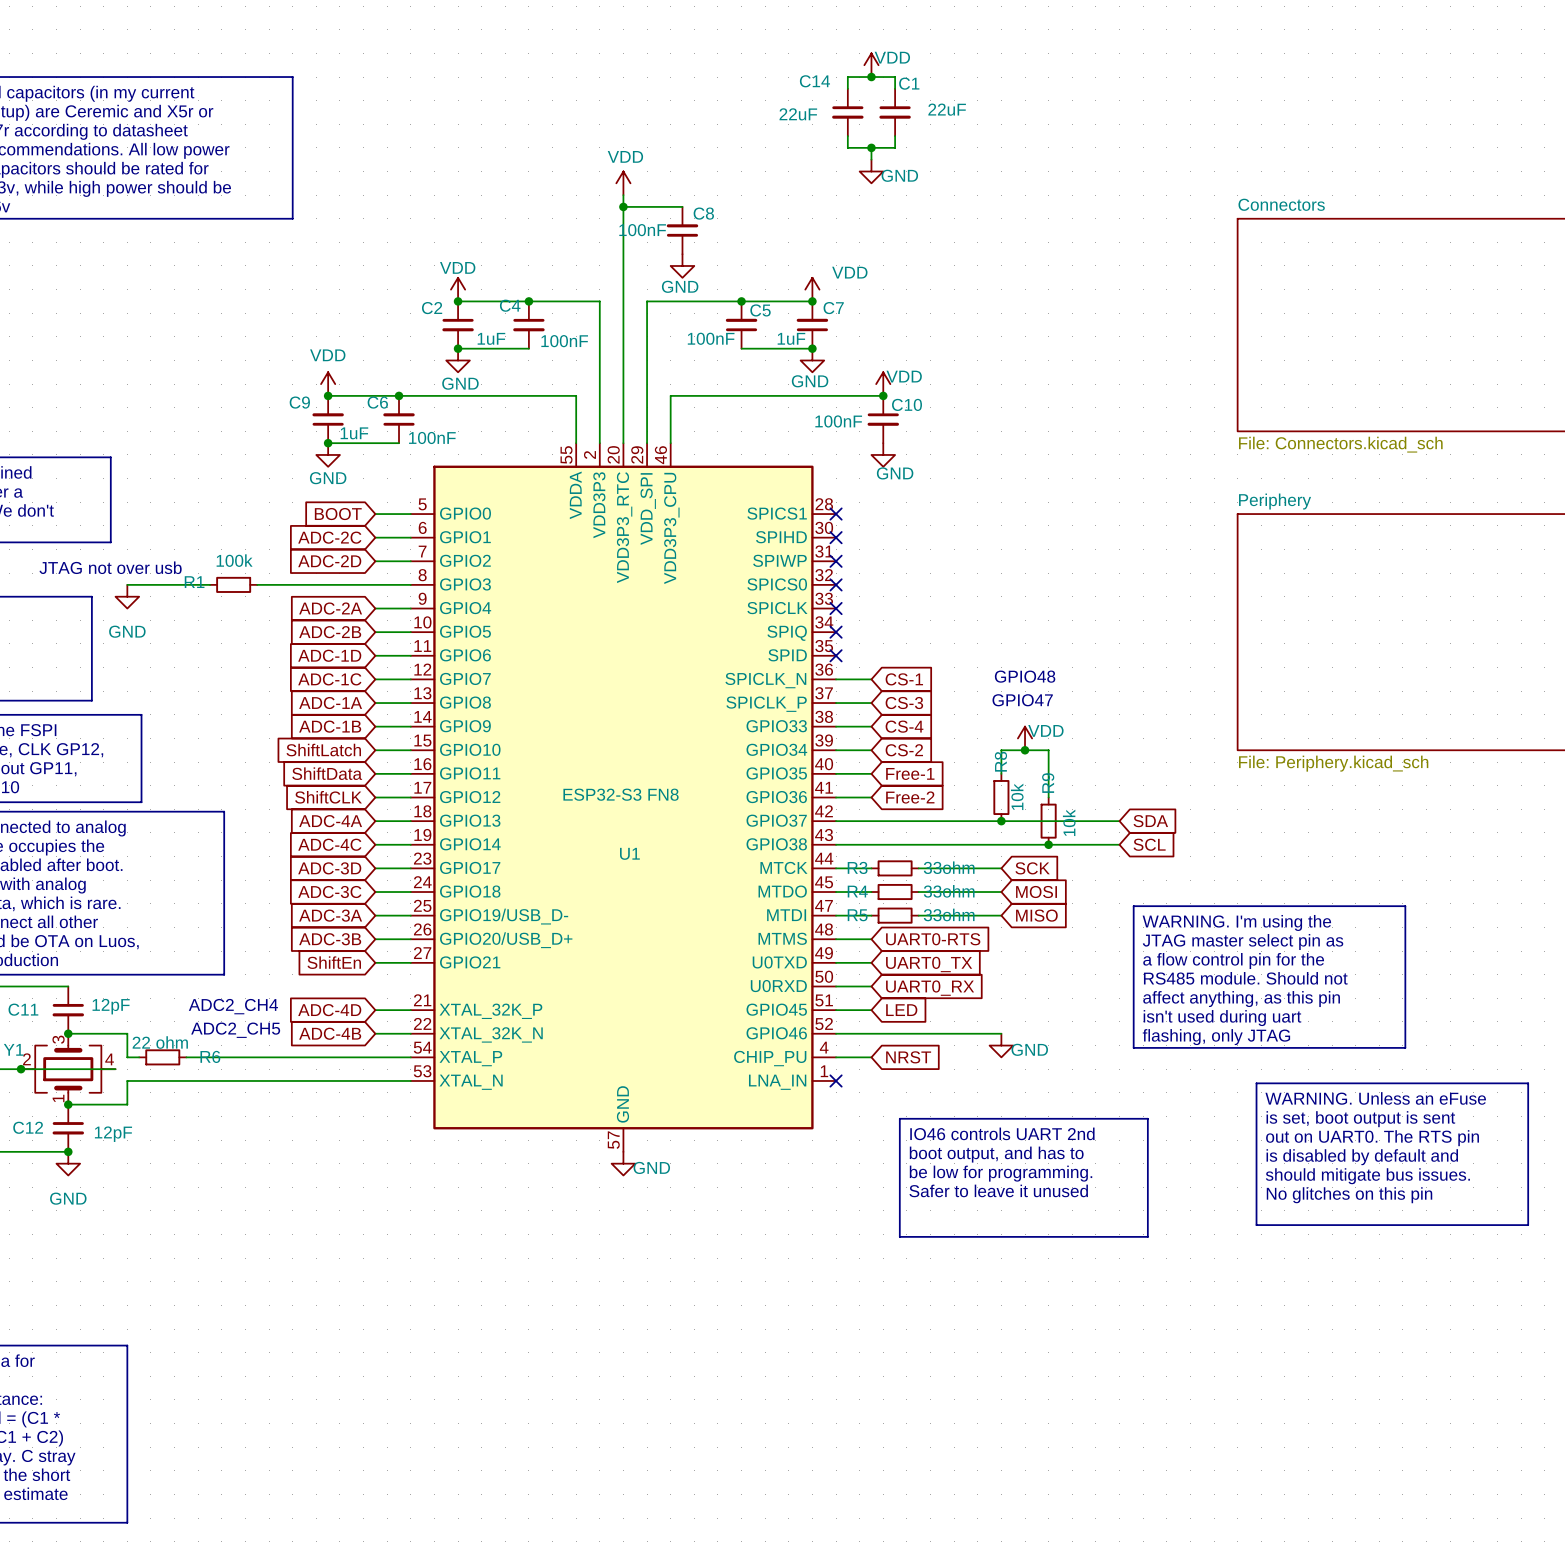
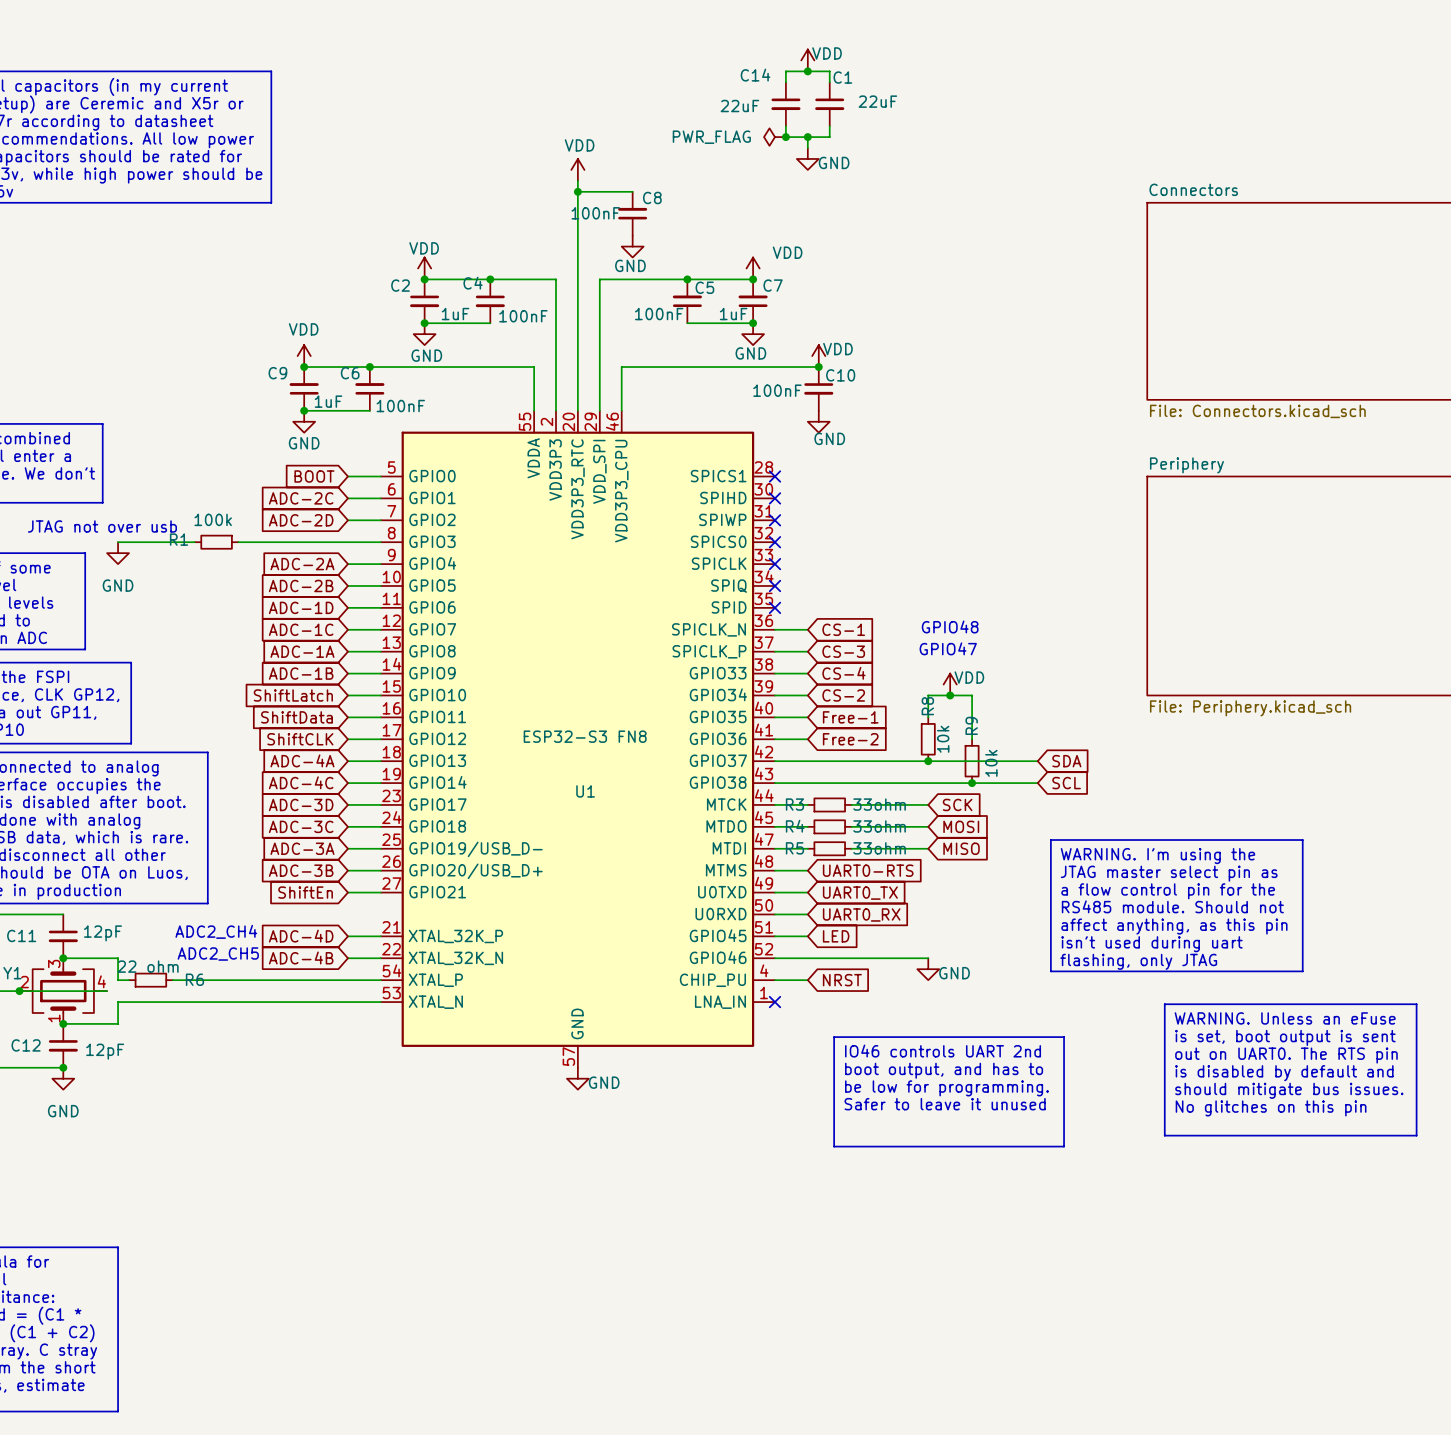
power symbol: none -> PWR_FLAG (774, 137)
junction: none -> (785, 137)

